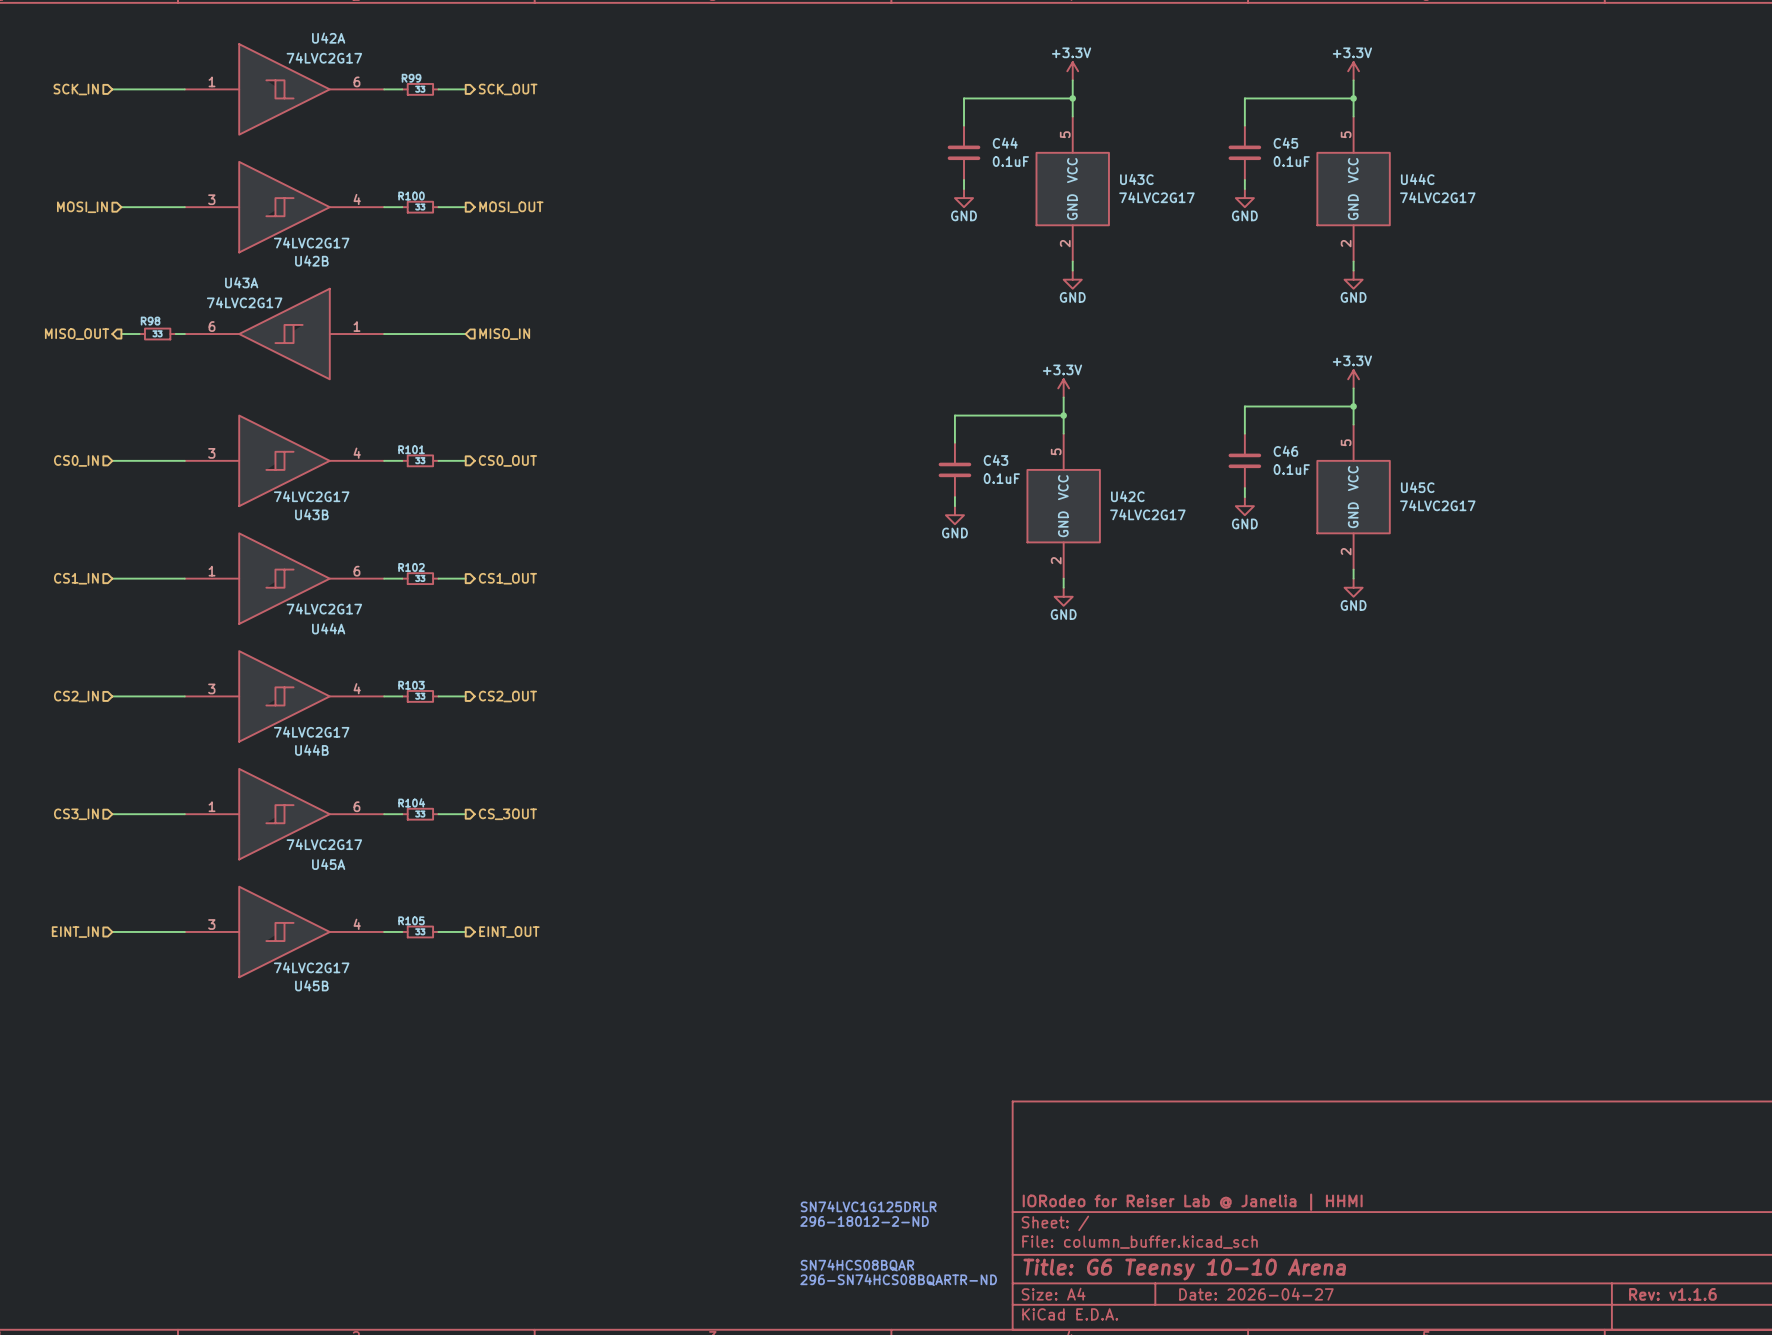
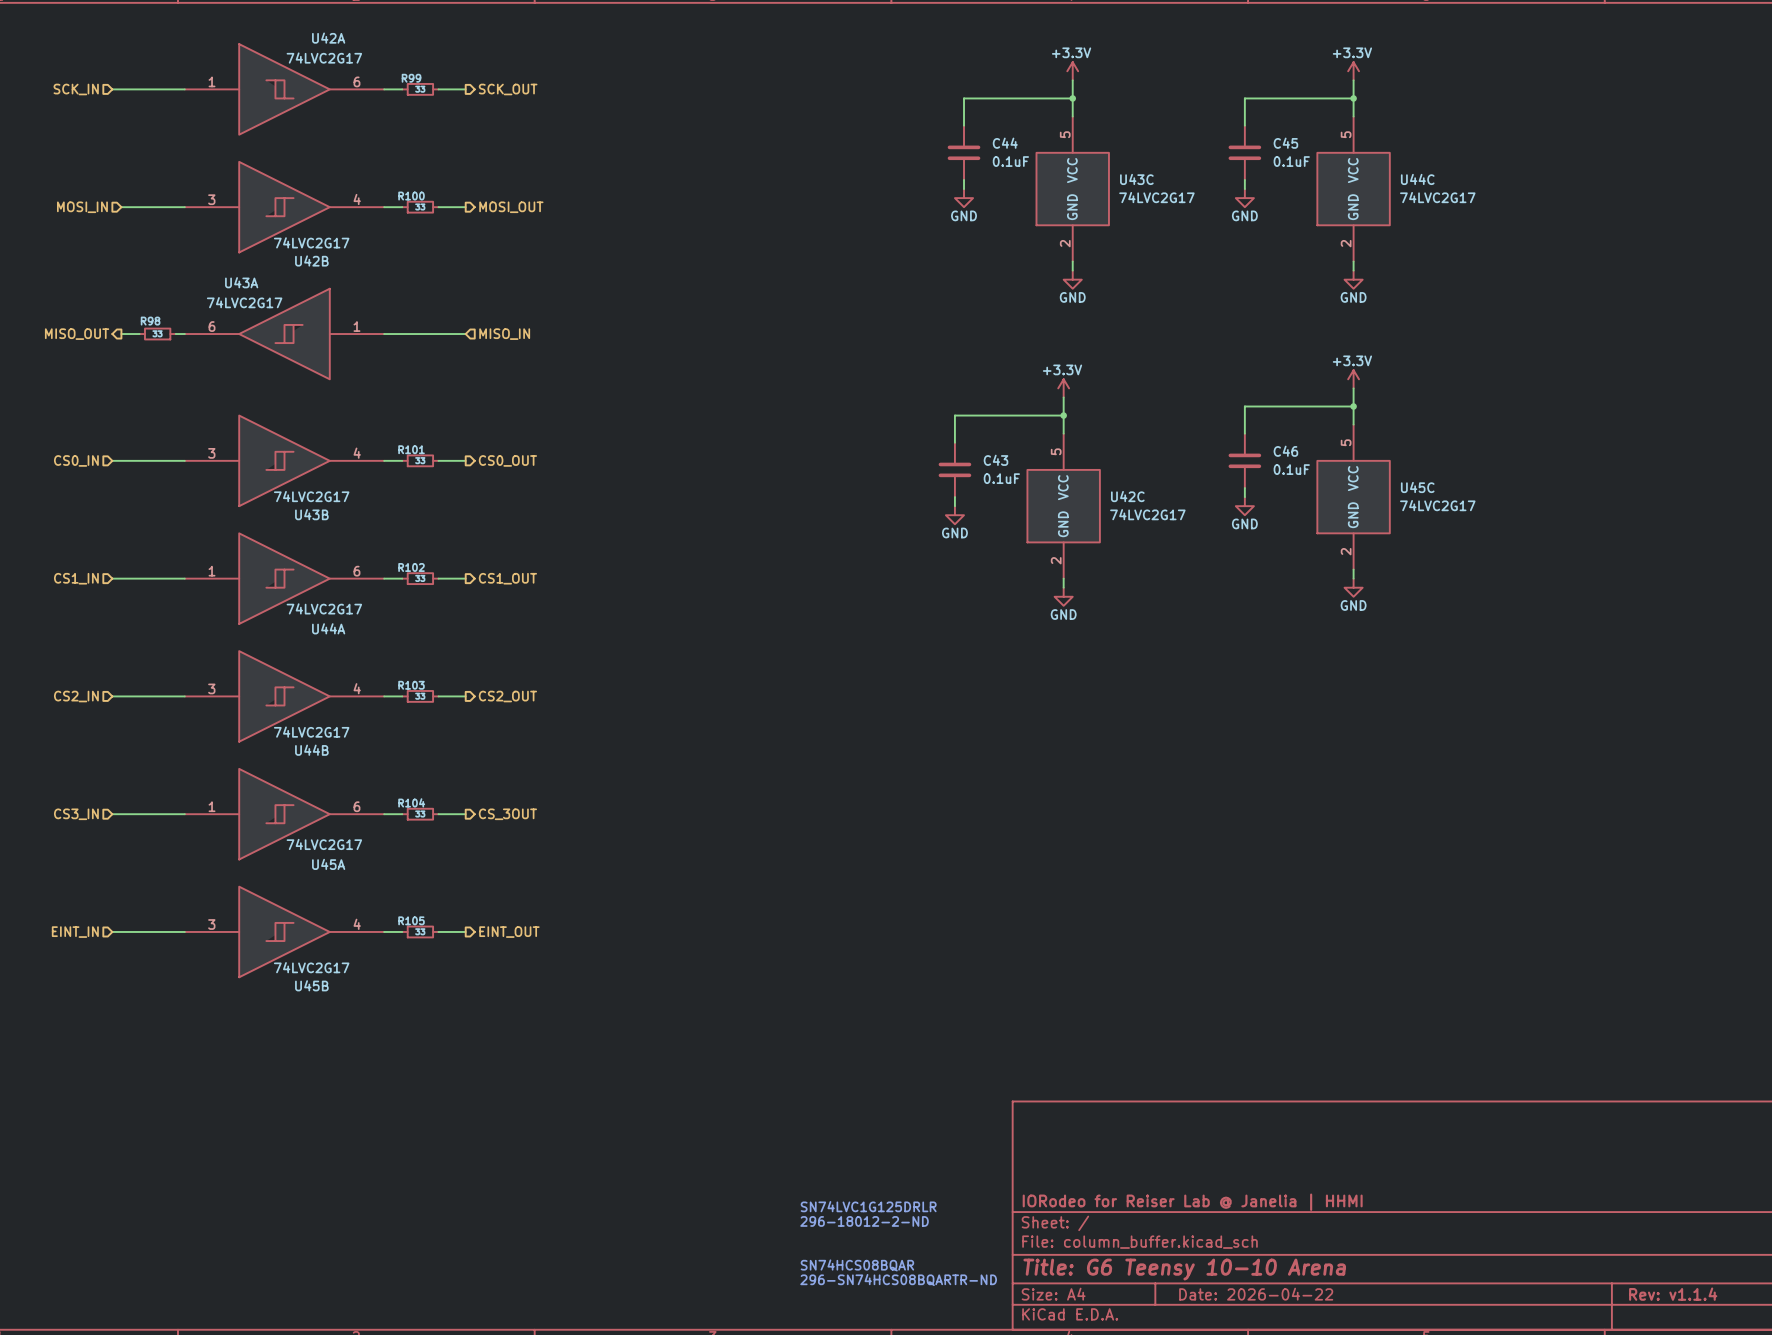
title block: Date: 2026-04-27 (1256, 1294) -> Date: 2026-04-22 (1256, 1294)
title block: Rev: v1.1.6 (1672, 1294) -> Rev: v1.1.4 (1673, 1294)

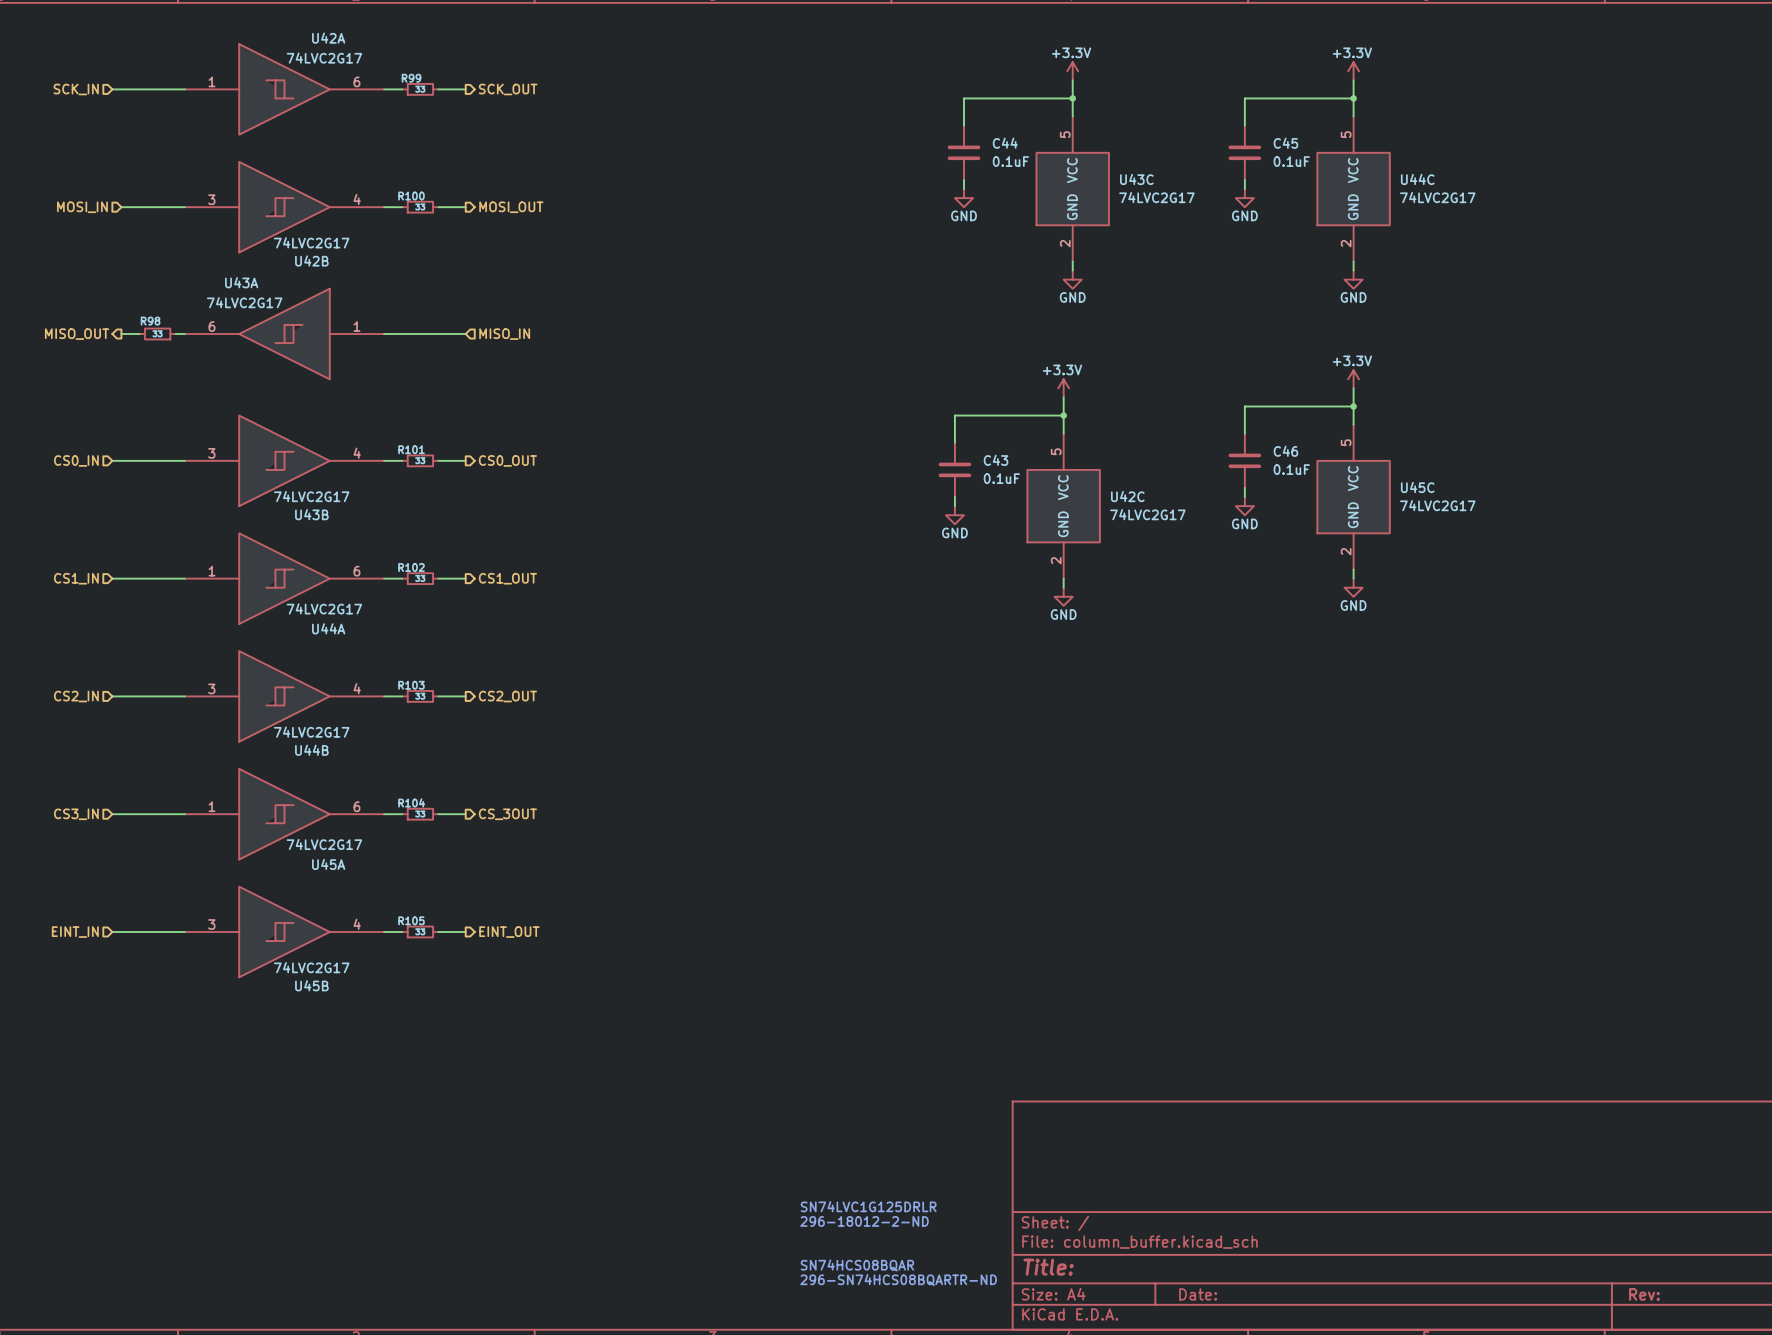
title block: IORodeo for Reiser Lab @ Janelia | HHMI (1192, 1202) -> none
title block: Title: G6 Teensy 10-10 Arena (1184, 1269) -> Title: (1048, 1267)
title block: Date: 2026-04-22 (1256, 1294) -> Date: (1198, 1294)
title block: Rev: v1.1.4 (1673, 1294) -> Rev: (1644, 1294)

